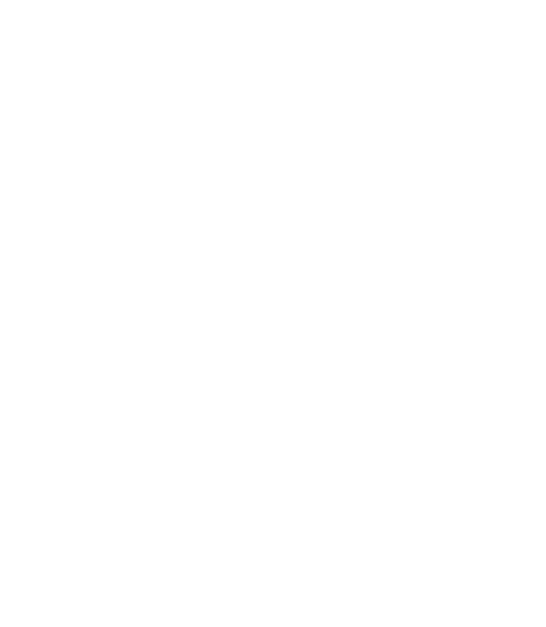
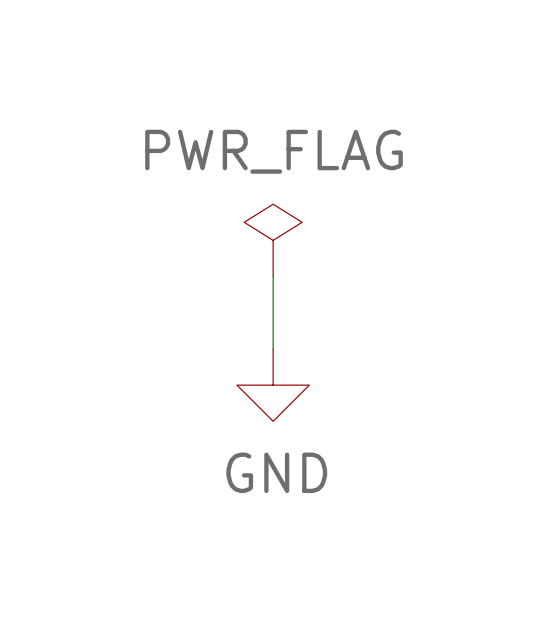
power symbol: none -> PWR_FLAG (273, 240)
wire: none -> (273, 276) (273, 348)
power symbol: none -> GND (273, 385)

